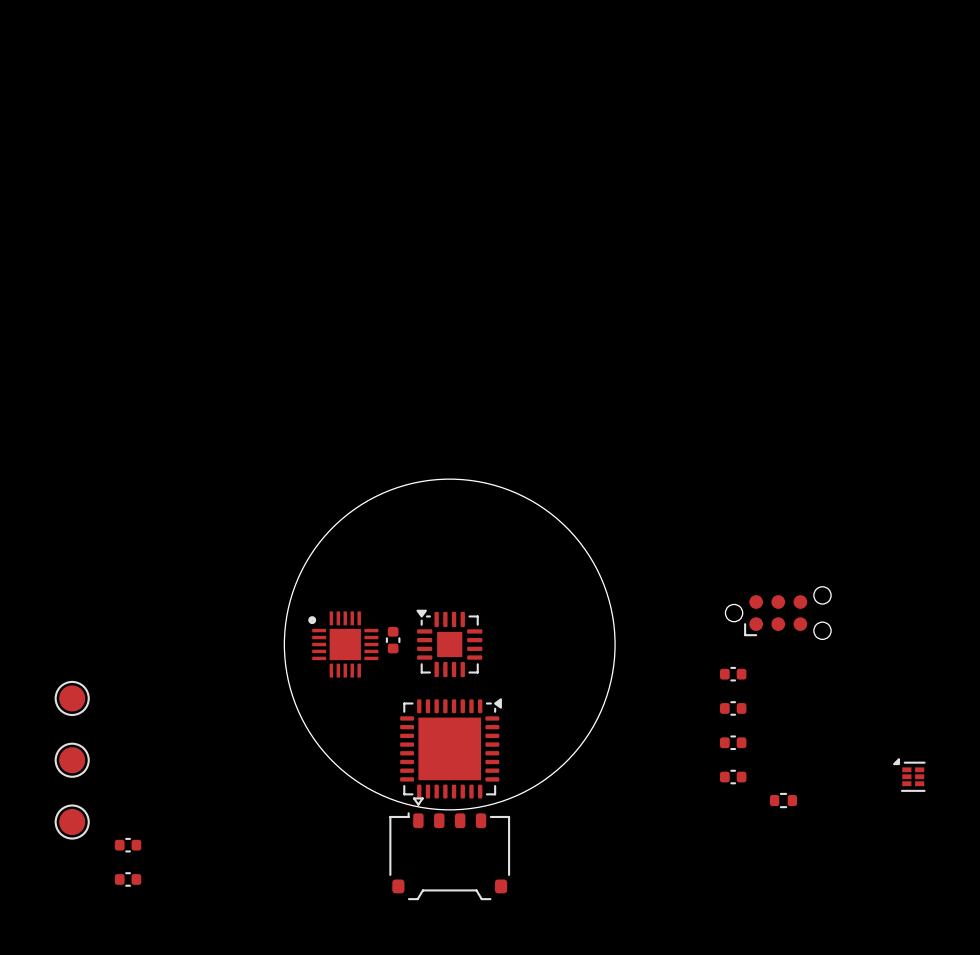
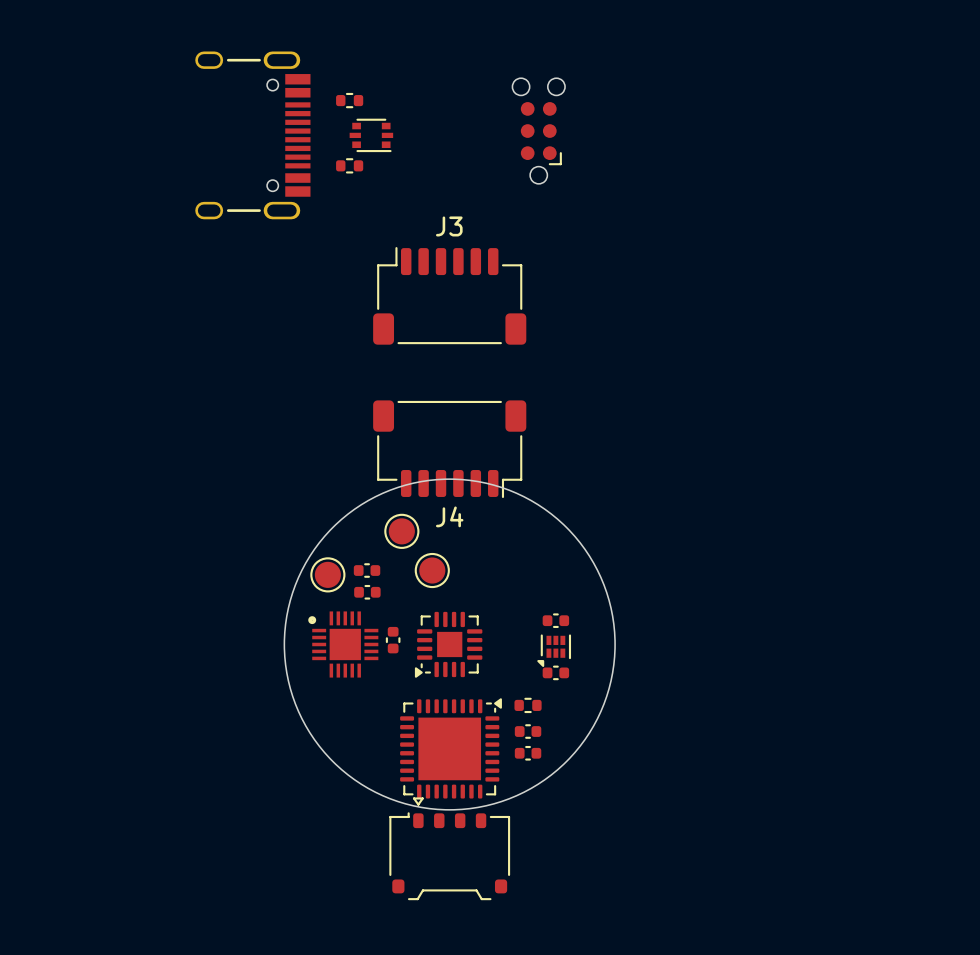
part: none -> (349, 100)
part: none -> (538, 131)
part: none -> (252, 135)
part: none -> (371, 135)
part: none -> (349, 165)
J3: none -> (449, 295)
J4: none -> (449, 449)
part: none -> (401, 531)
part: none -> (367, 570)
part: none -> (432, 570)
part: none -> (327, 574)
part: none -> (367, 592)
part: (778, 613) -> none
part: none -> (555, 620)
part rotation: 0° (449, 643) -> 90° counterclockwise (448, 644)
part: none -> (555, 672)
part: (733, 674) -> none
part: (72, 698) -> none
part: (733, 708) -> none
part: none -> (528, 731)
part: (733, 742) -> none
part: none -> (528, 753)
part: (72, 760) -> none
part rotation: 0° (909, 775) -> 90° counterclockwise (554, 650)
part position: (909, 775) -> (554, 650)
part: (733, 777) -> none
part position: (783, 800) -> (528, 705)
part: (72, 822) -> none
part: (128, 845) -> none
part: (128, 879) -> none

